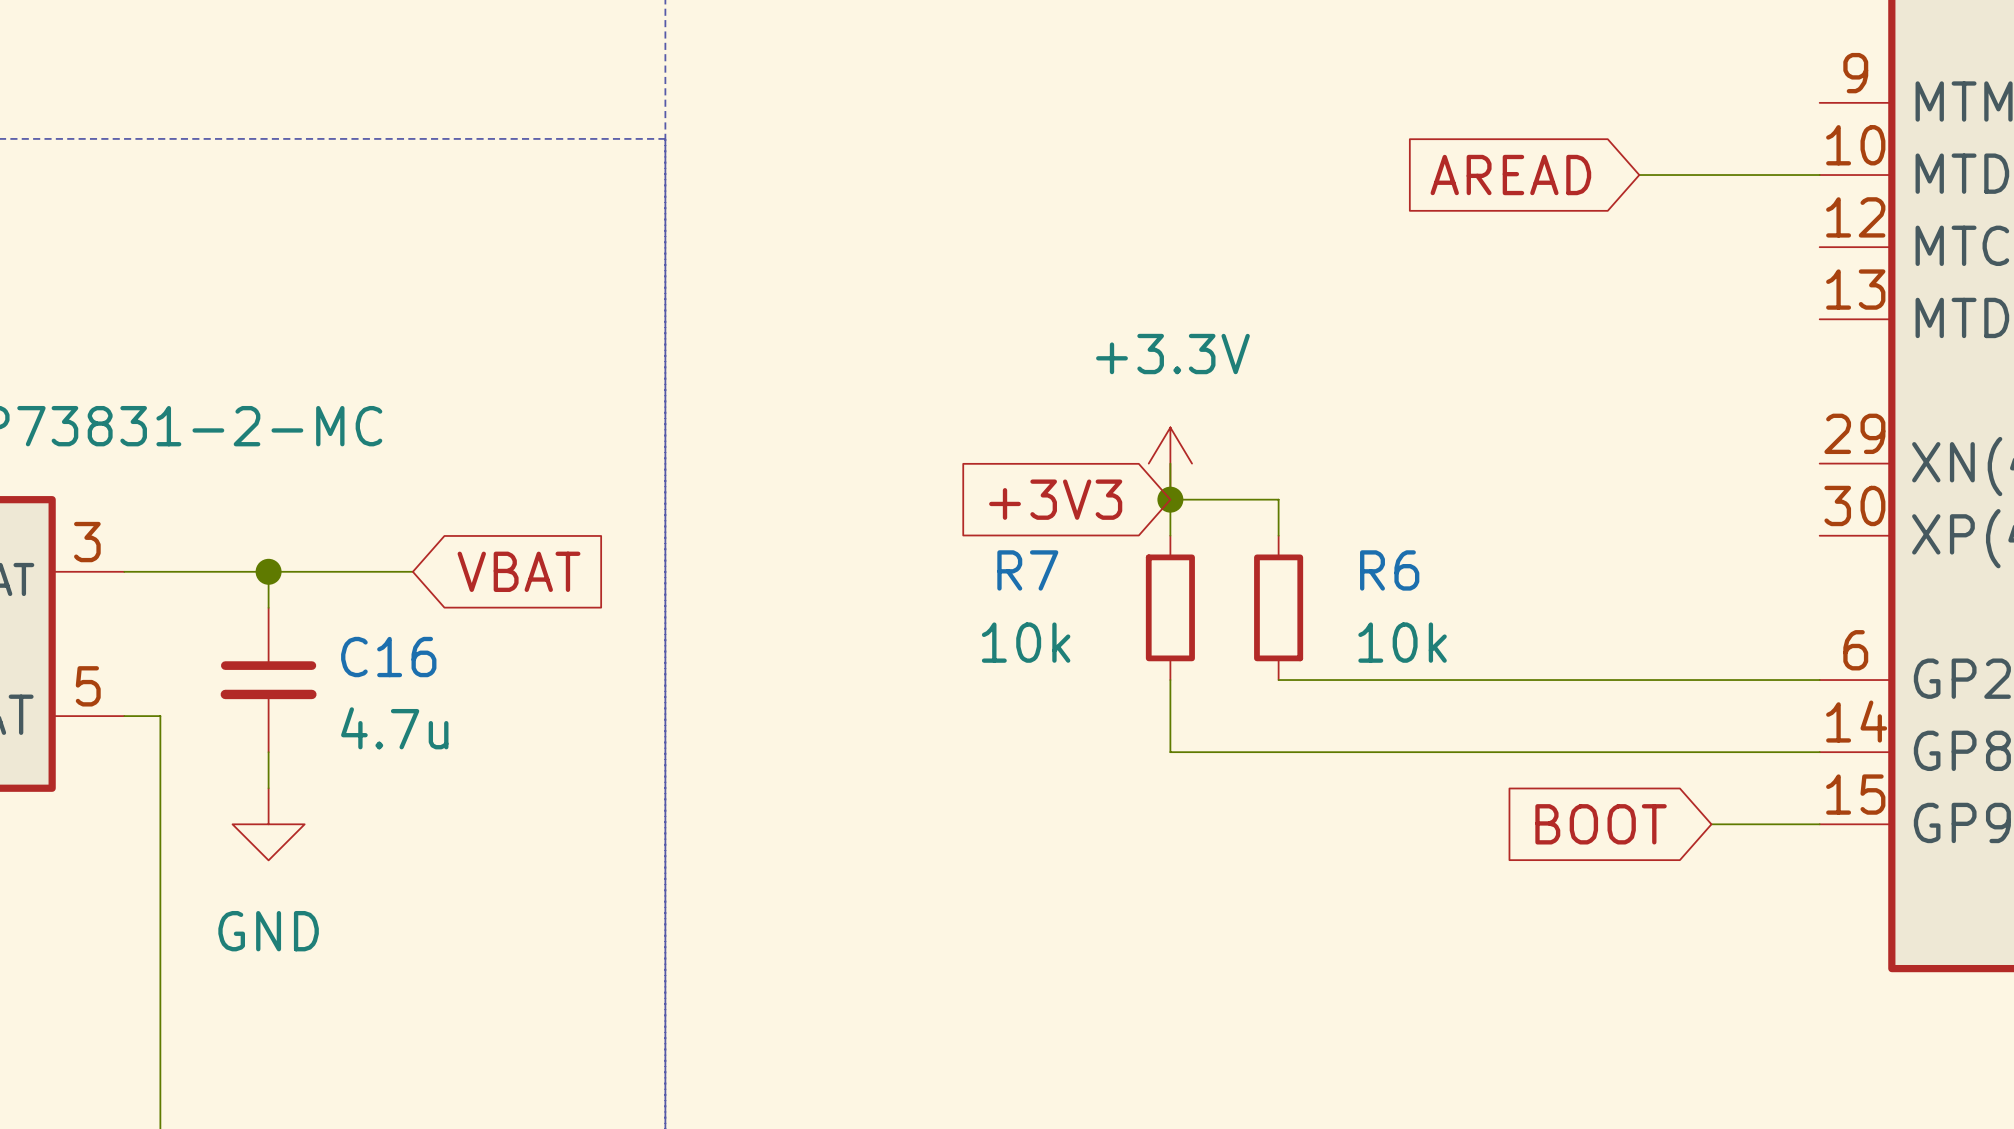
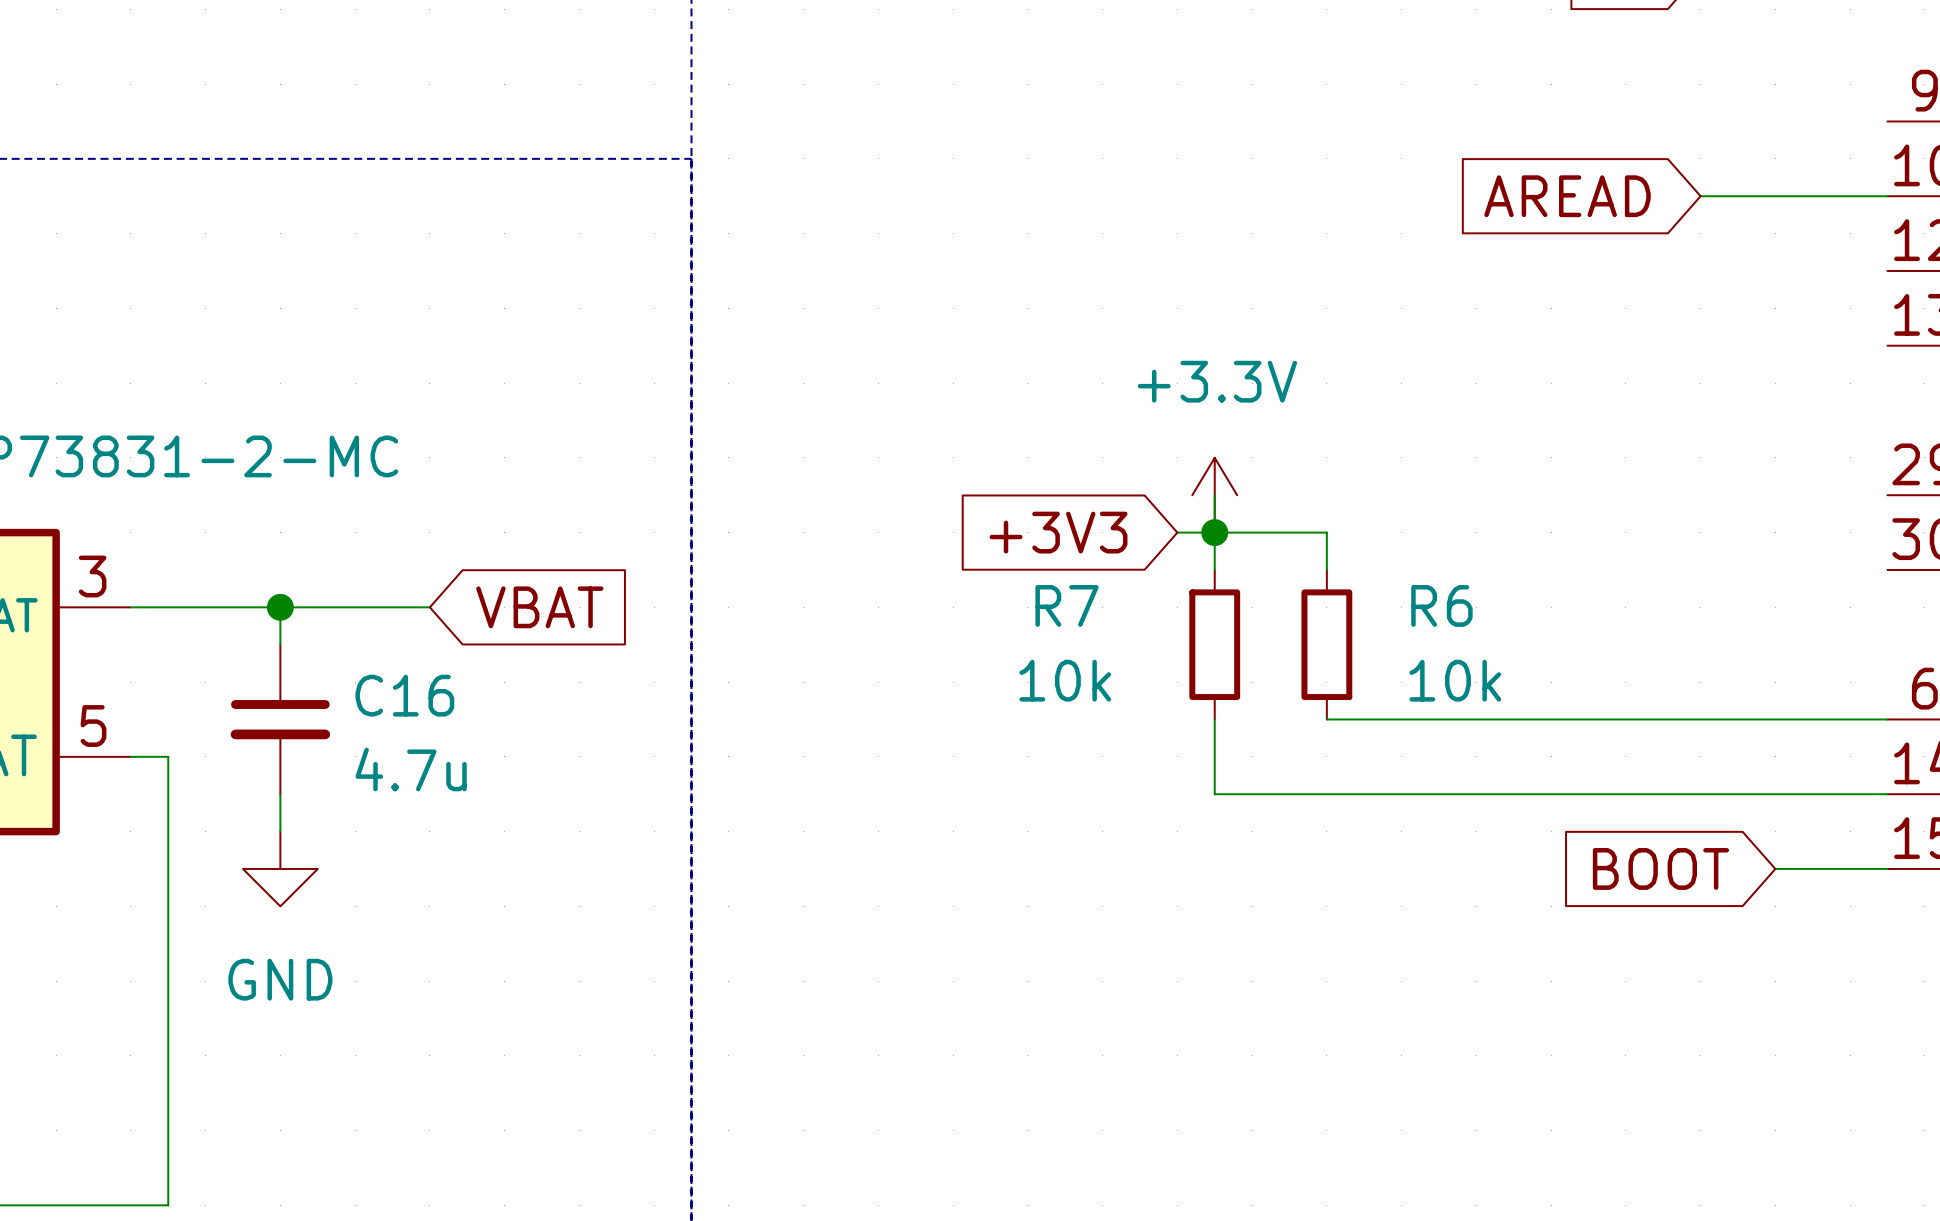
global label position: +3V3 (1055, 499) -> +3V3 (1058, 532)
wire: none -> (1177, 532) (1214, 532)

